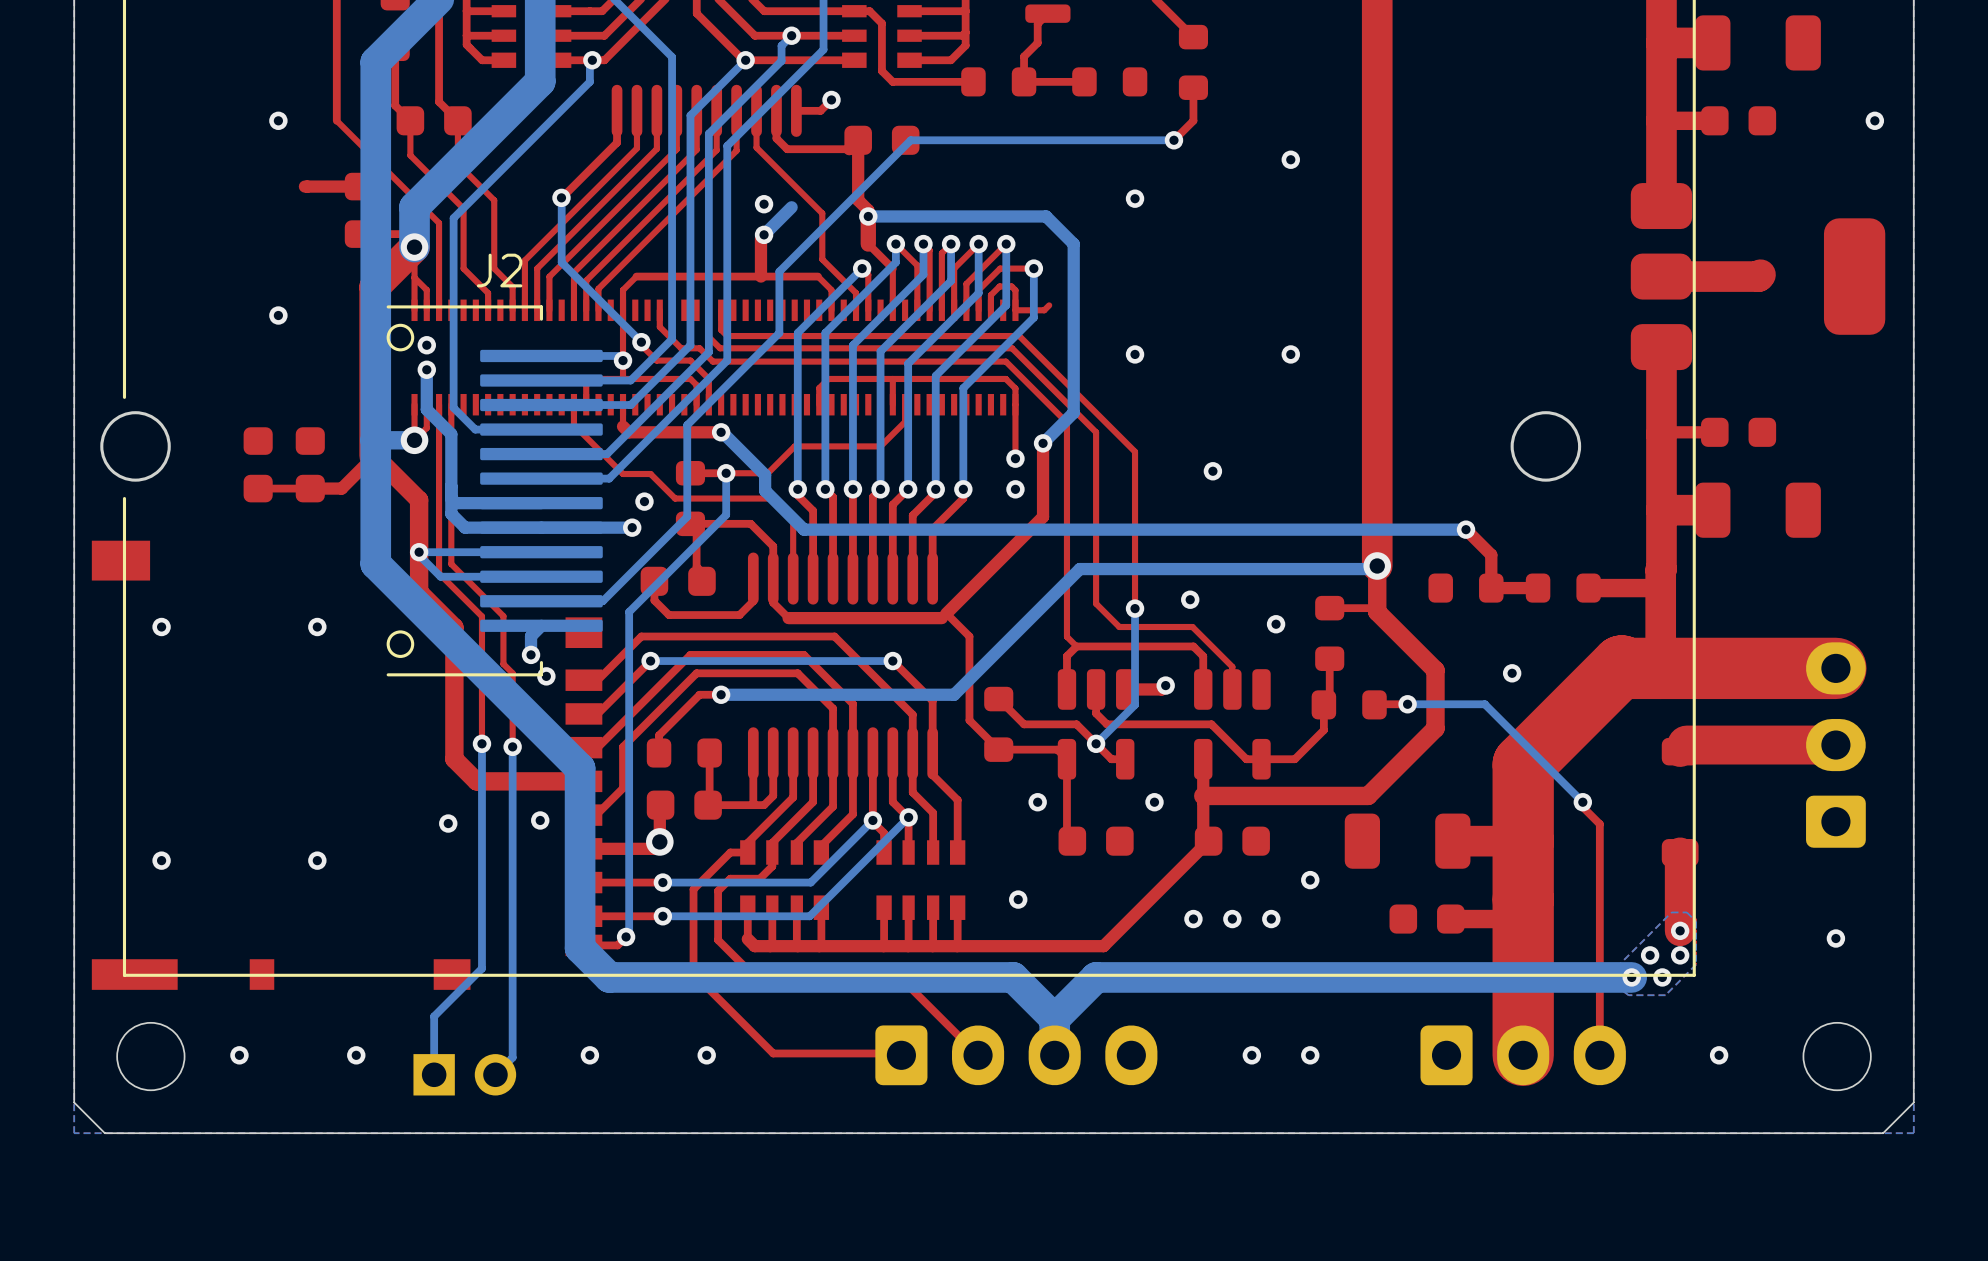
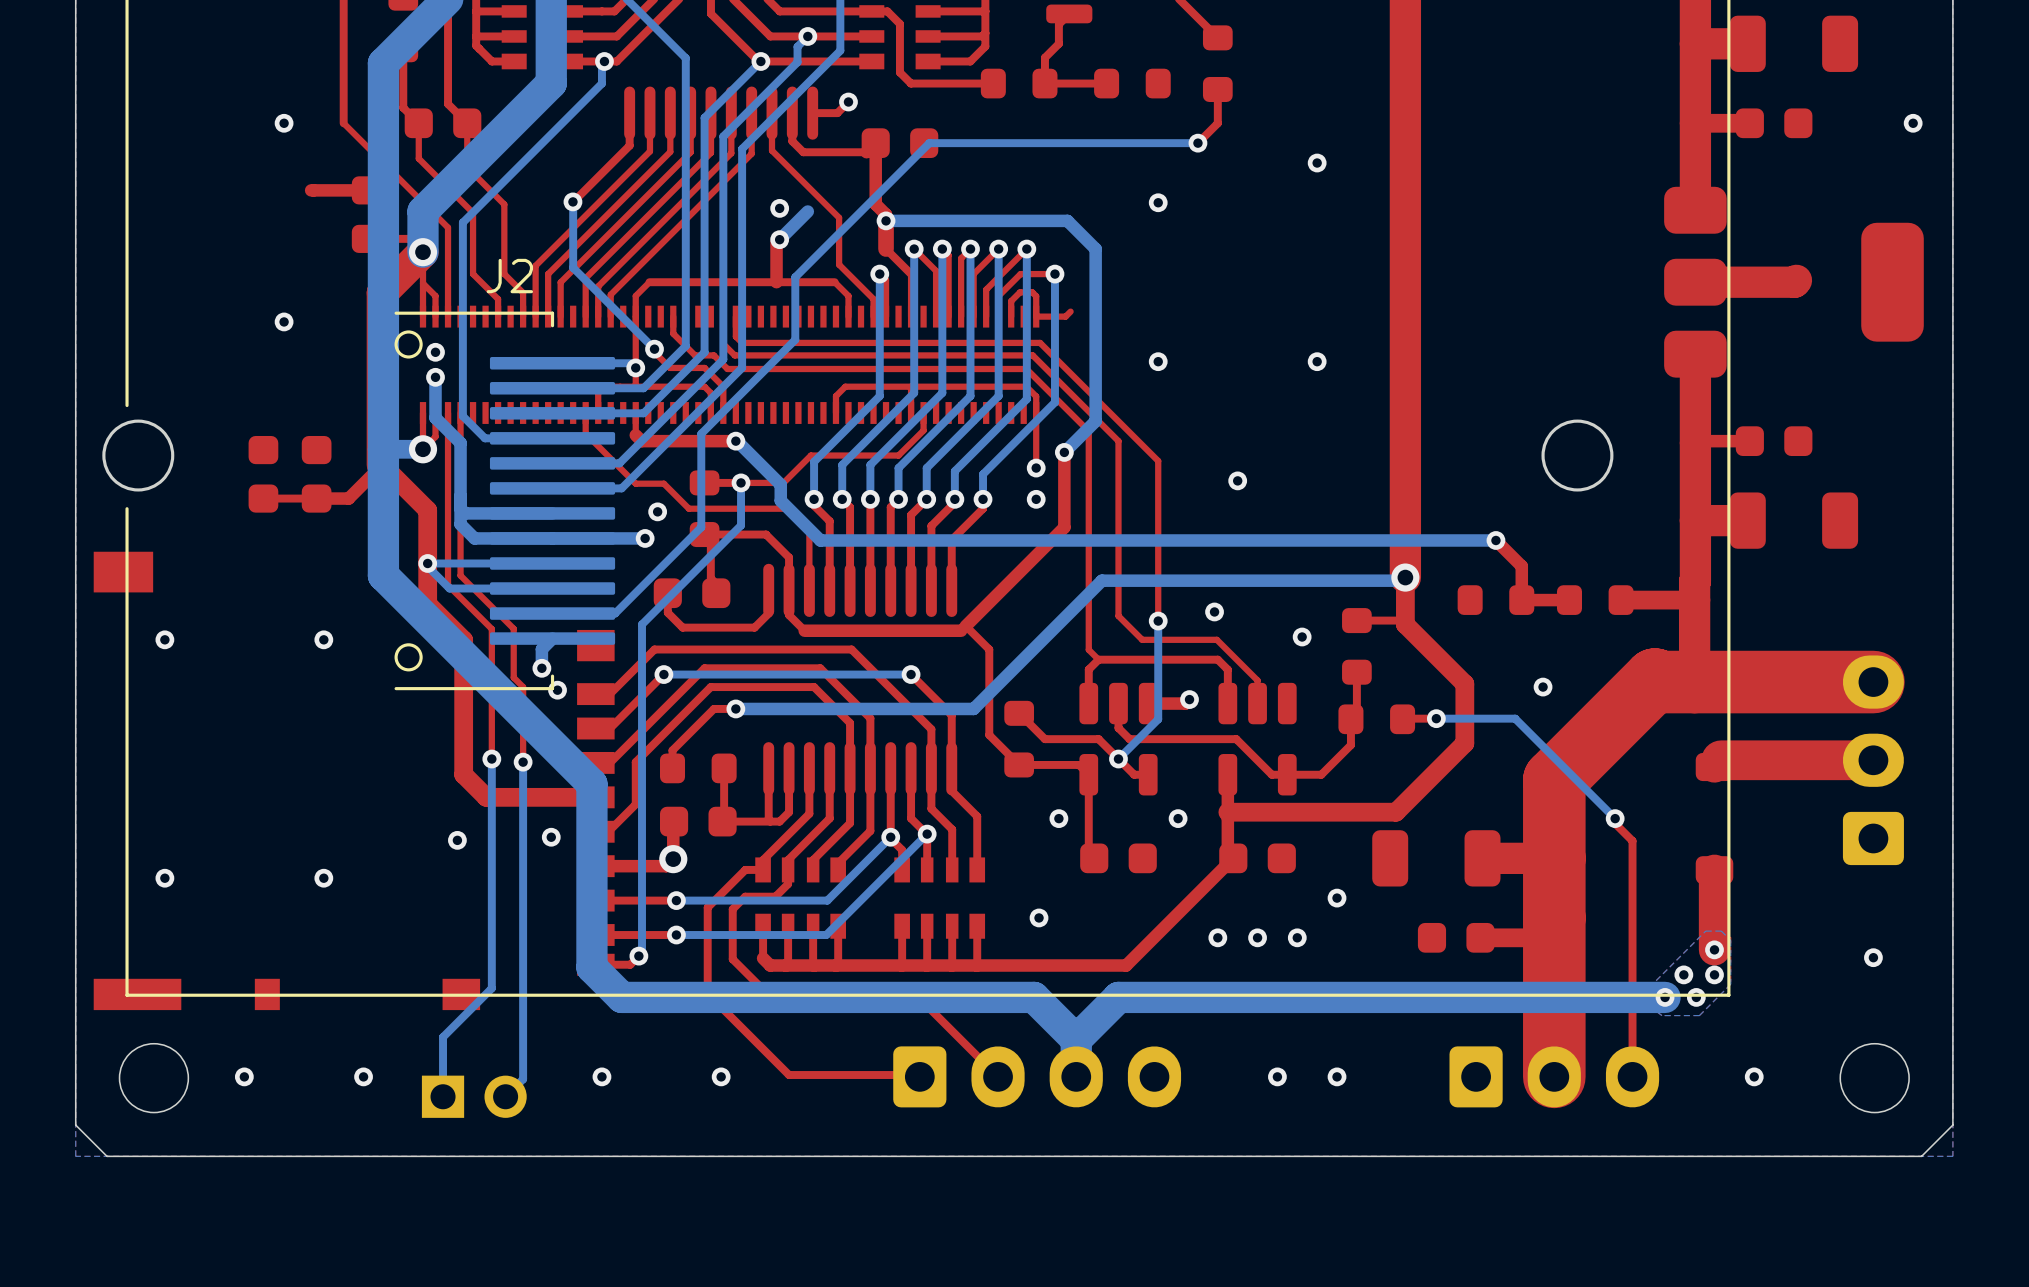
bottom track: (895, 262) (825, 332) (825, 455) -> (914, 267) (914, 392) (842, 464)
bottom track: (862, 268) (797, 332) (797, 452) -> (879, 274) (879, 396) (814, 461)
bottom track: (923, 274) (852, 345) (852, 455) -> (942, 280) (942, 392) (870, 464)
bottom track: (951, 280) (880, 351) (880, 458) -> (970, 286) (970, 396) (898, 468)
bottom track: (978, 293) (908, 363) (908, 458) -> (998, 299) (998, 396) (926, 468)
bottom track: (1006, 305) (935, 375) (935, 461) -> (1026, 311) (1026, 399) (954, 471)
bottom track: (1033, 317) (963, 388) (963, 464) -> (1054, 324) (1054, 402) (983, 474)

